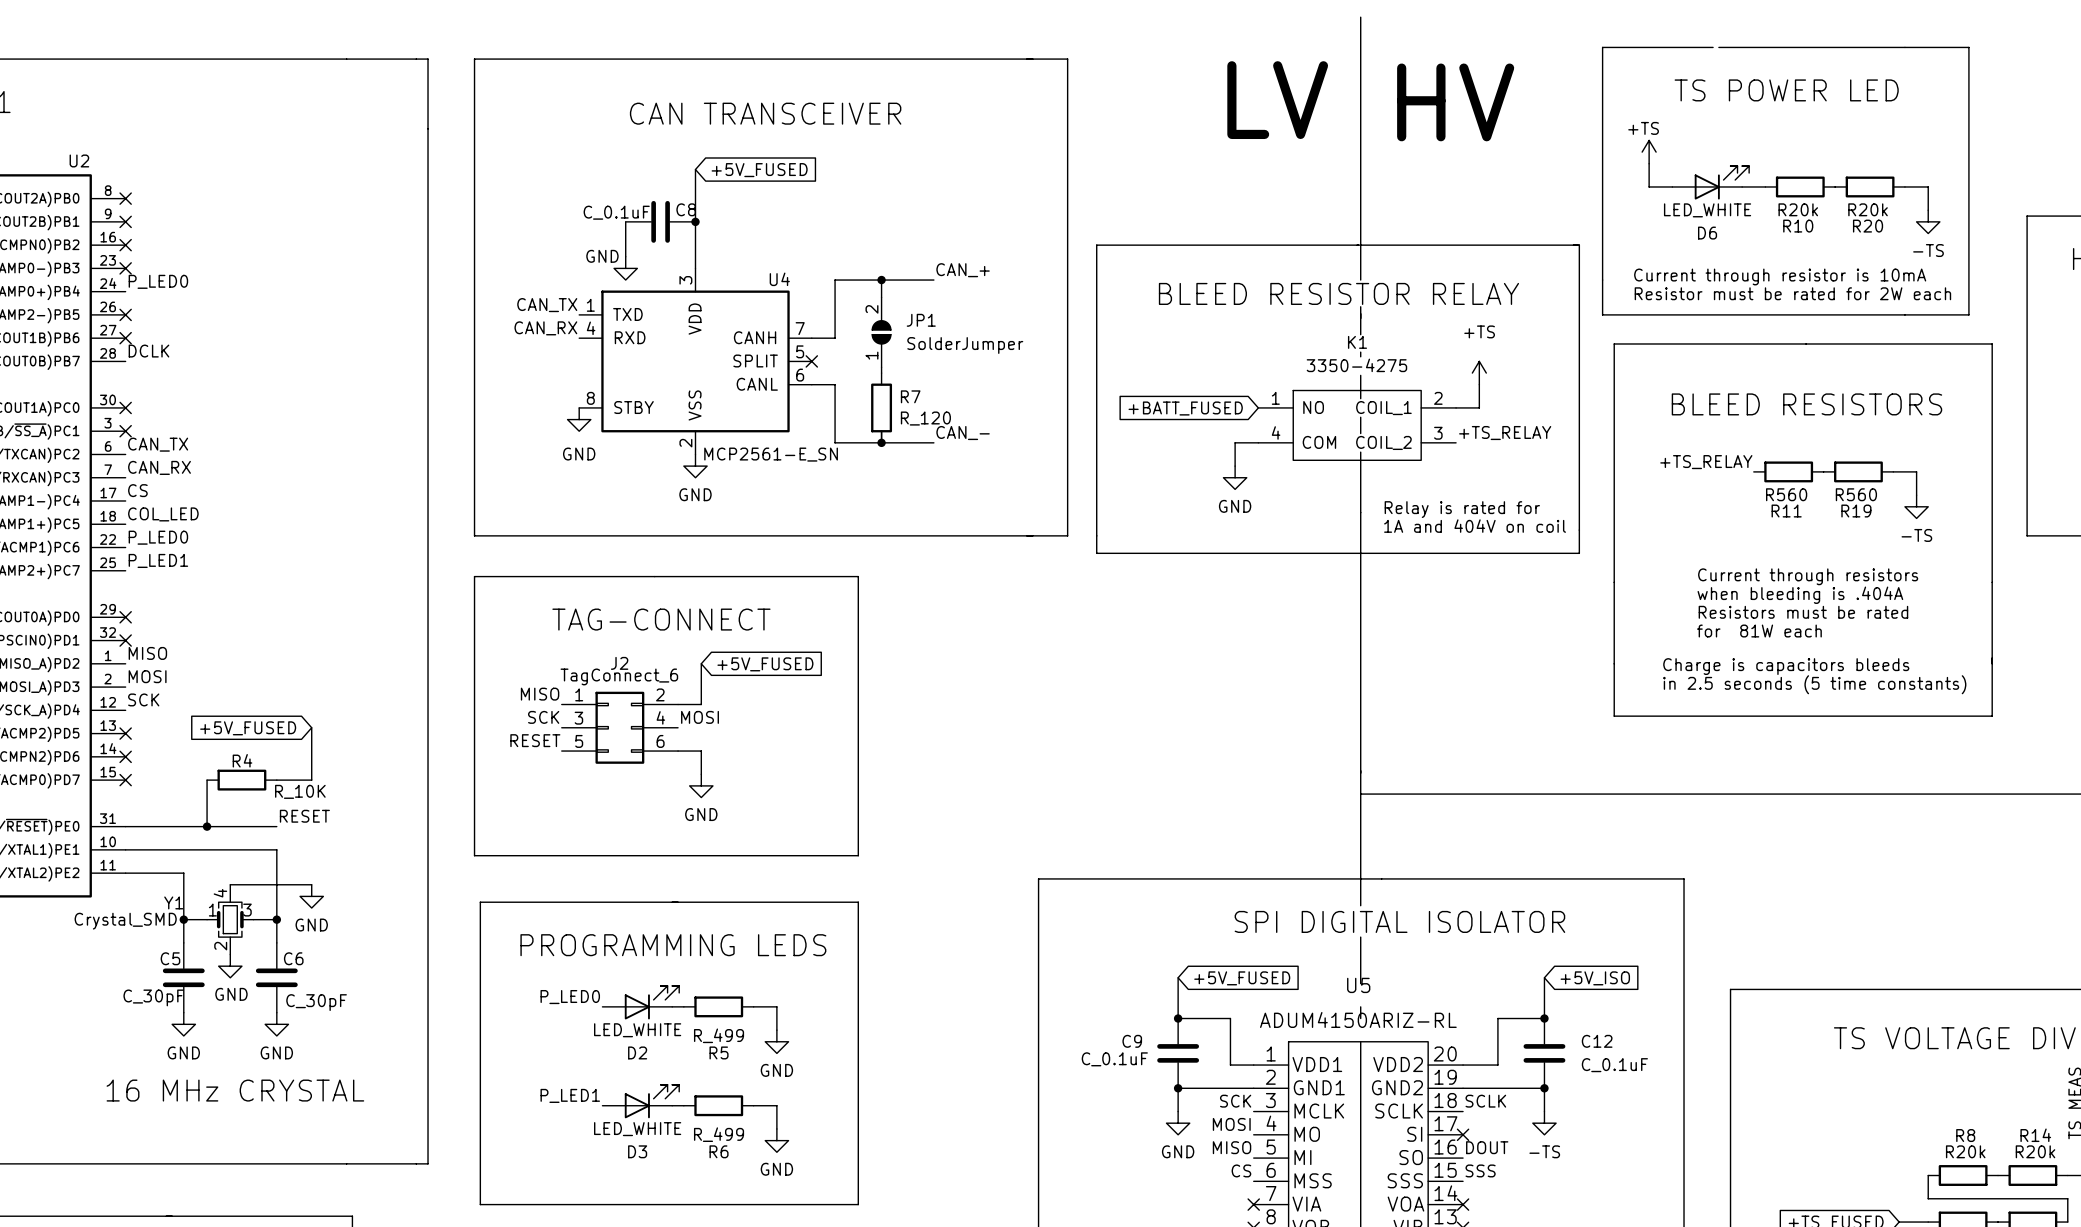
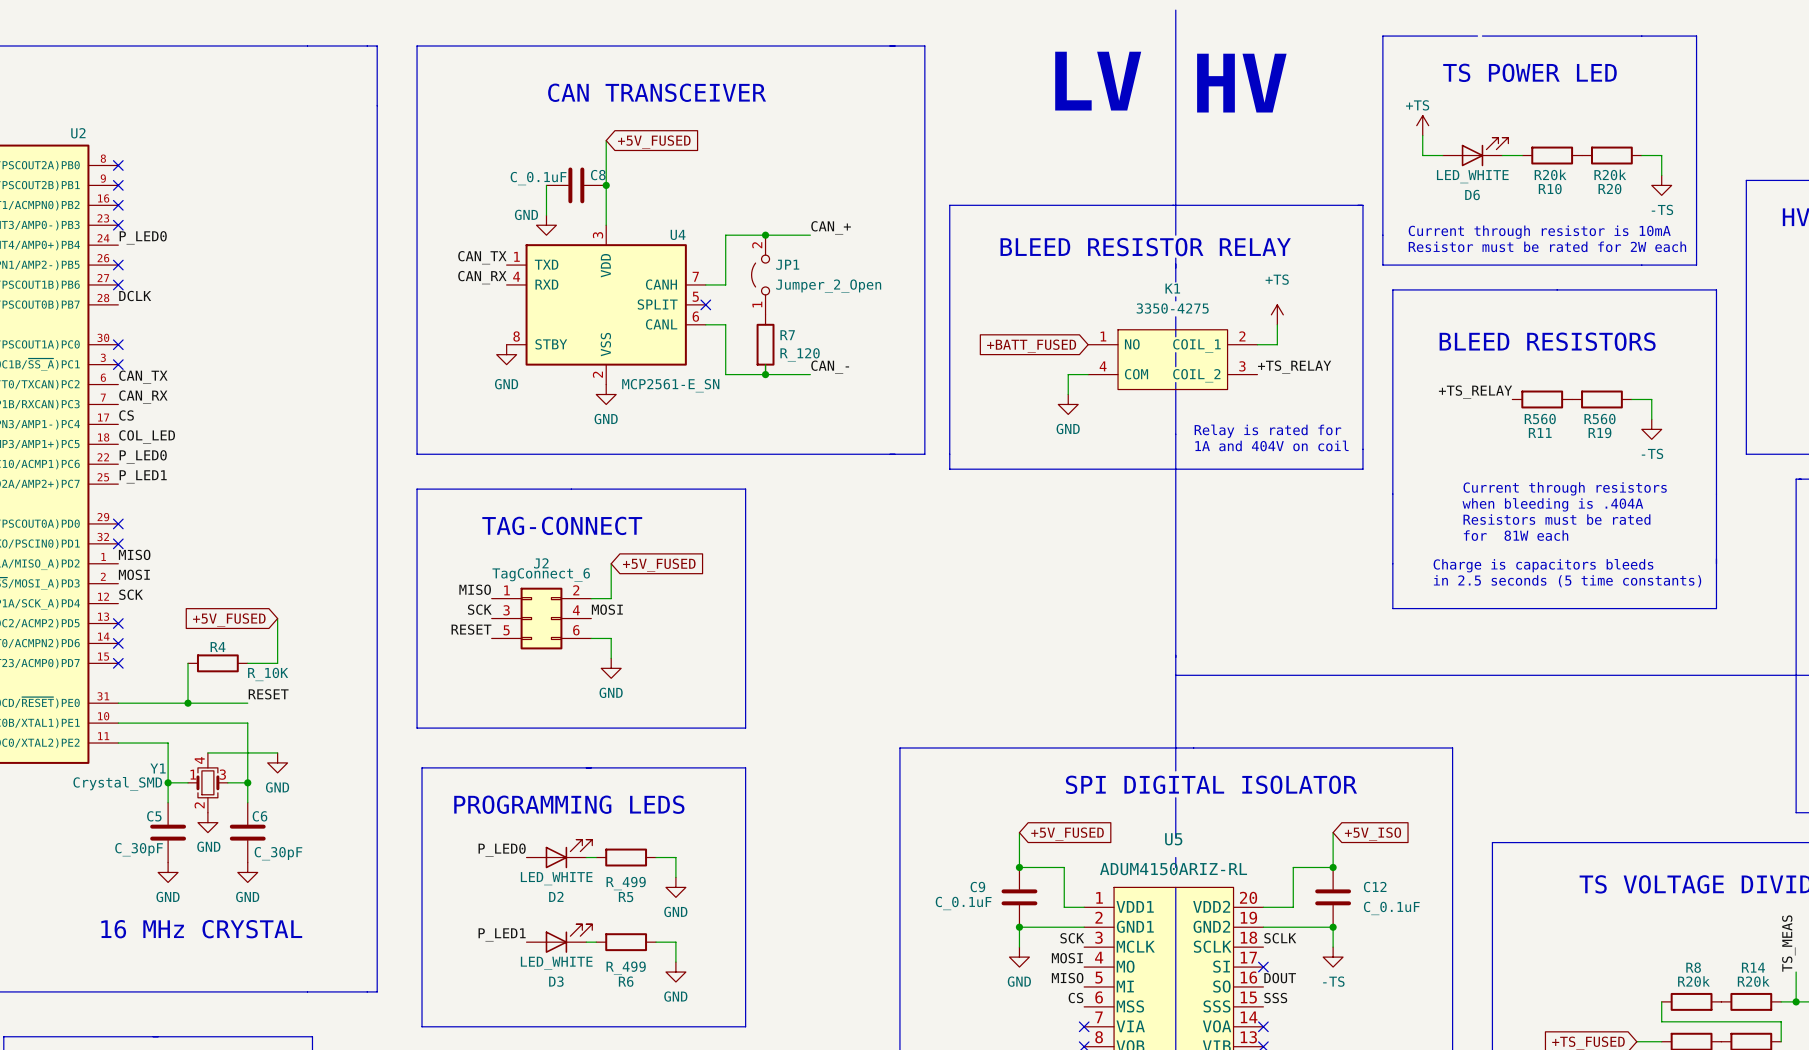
JP1 symbol: [872, 297, 891, 368] -> [751, 235, 770, 315]
JP1 value: SolderJumper (965, 345) -> Jumper_2_Open (828, 286)

